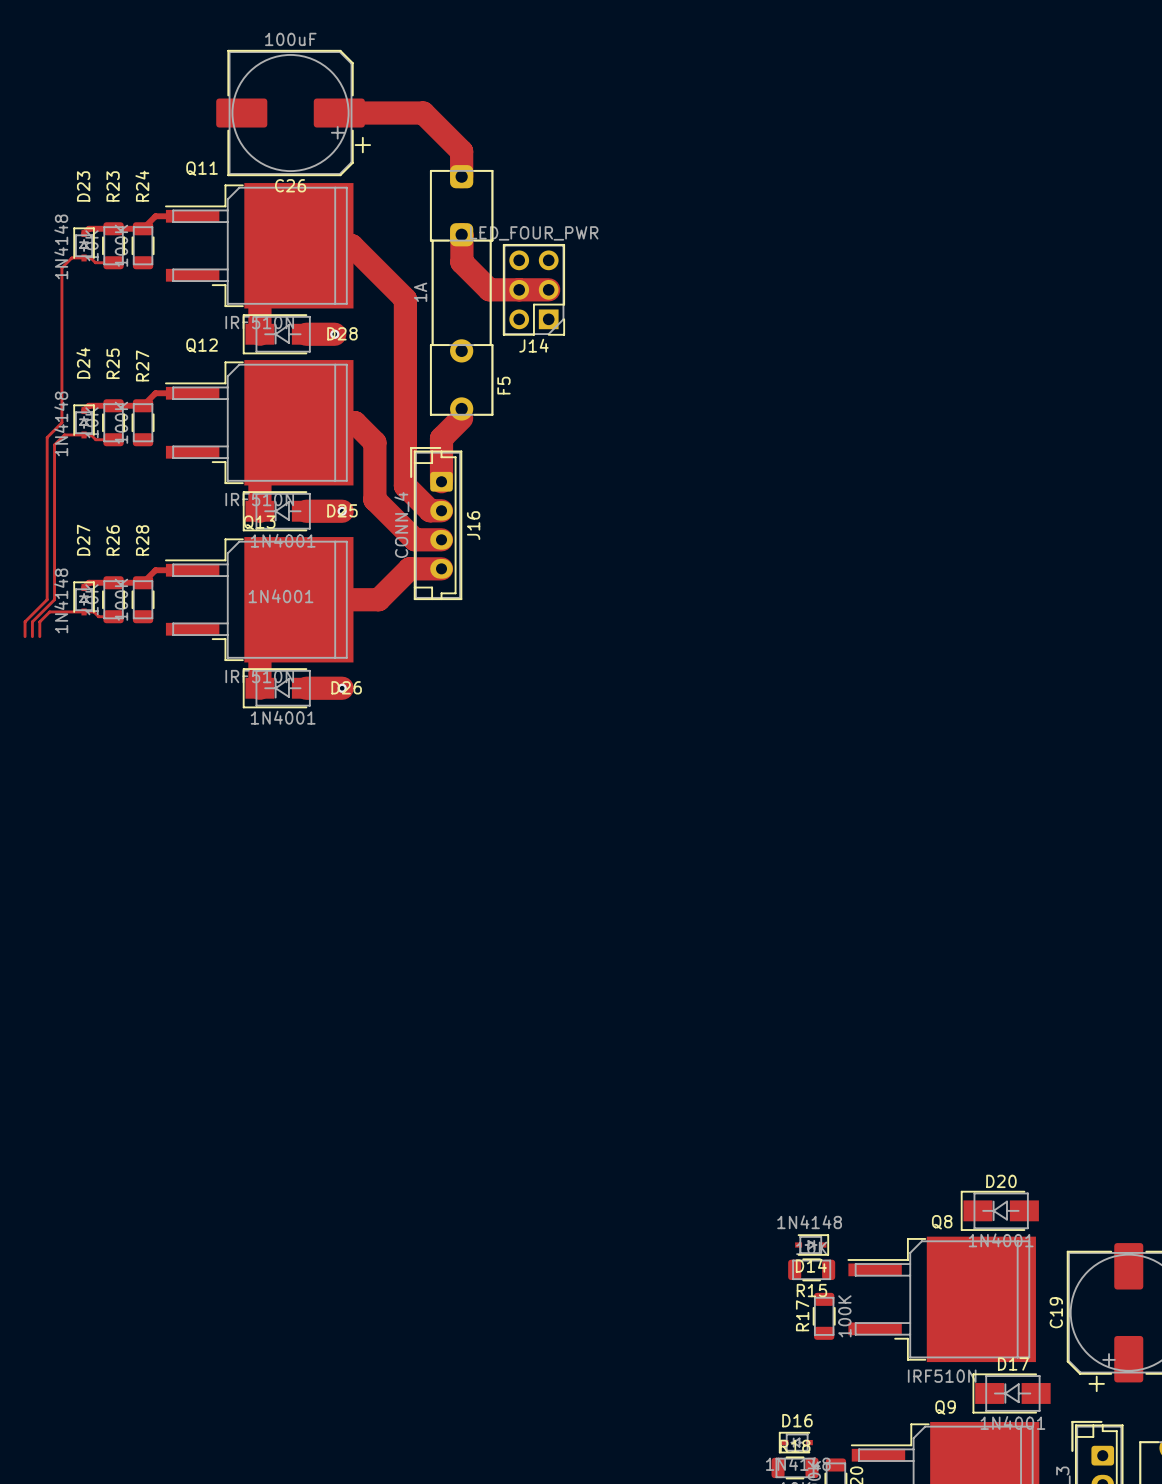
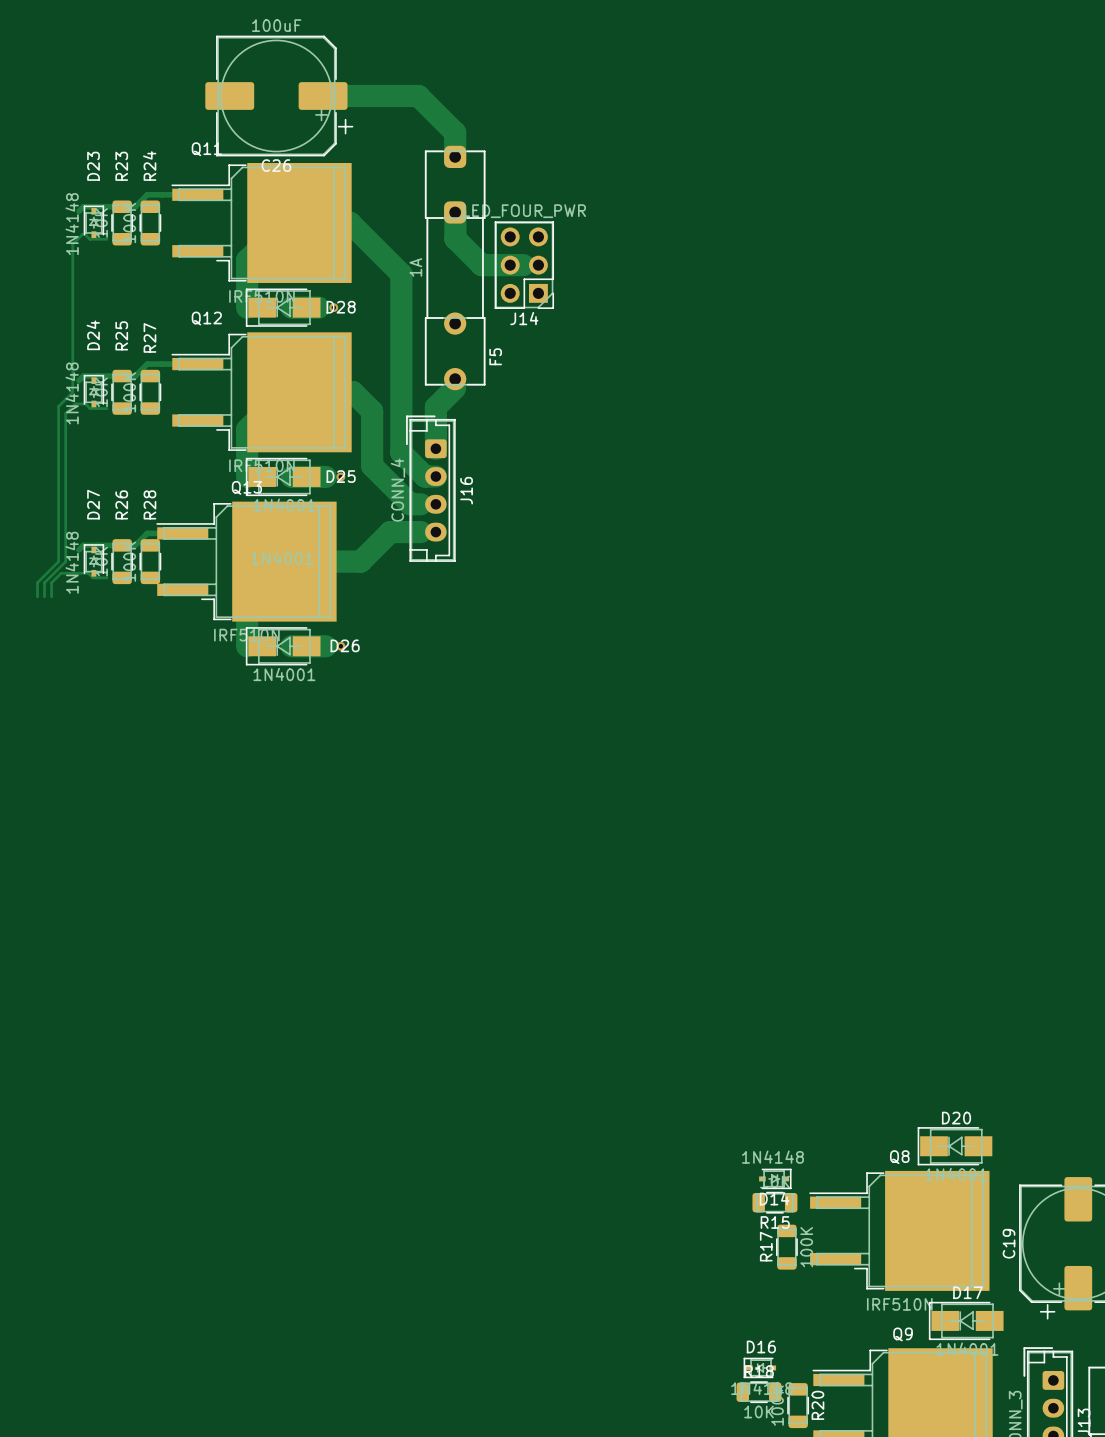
track: (423, 113) (461, 151) (461, 176) -> (403, 96) (418, 96) (455, 132) (455, 156)
track: (461, 234) (461, 262) (489, 289) (505, 289) -> (455, 212) (455, 238) (481, 265)
D23 position: (84, 244) -> (93, 221)
R23 position: (113, 245) -> (122, 222)
R24 position: (143, 245) -> (150, 222)
Q11 position: (259, 245) -> (261, 222)
track: (351, 245) (405, 299) (405, 485) (430, 510) (441, 510) -> (335, 222) (350, 222) (401, 274) (401, 452) (425, 476) (435, 476)
track: (87, 257) (71, 257) (61, 267) (61, 422) (47, 437) (47, 599) (25, 621) (25, 636) -> (82, 234) (72, 244) (72, 392) (58, 406) (58, 561) (37, 582) (37, 596)
J14 position: (533, 289) -> (524, 265)
F5 position: (461, 292) -> (455, 268)
D28 position: (281, 334) -> (283, 307)
via position: (334, 334) -> (333, 307)
track: (461, 418) (441, 438) (441, 481) -> (455, 388) (435, 407) (435, 448)
D24 position: (84, 421) -> (93, 391)
R25 position: (113, 422) -> (122, 392)
R27 position: (143, 422) -> (150, 392)
Q12 position: (259, 422) -> (261, 392)
track: (355, 422) (374, 442) (374, 499) (414, 539) (430, 539) -> (338, 392) (353, 392) (372, 411) (372, 465) (410, 504)
track: (80, 434) (64, 434) (54, 444) (54, 599) (32, 621) (32, 636) -> (75, 403) (65, 413) (65, 561) (44, 582) (44, 596)
D25 position: (281, 511) -> (283, 476)
via position: (342, 511) -> (340, 476)
J16 position: (436, 523) -> (430, 488)
D27 position: (84, 598) -> (93, 560)
R26 position: (113, 599) -> (122, 561)
R28 position: (143, 599) -> (150, 561)
track: (65, 611) (49, 611) (39, 621) (39, 636) -> (61, 573) (51, 582) (51, 596)
D26 position: (281, 688) -> (283, 646)
via position: (342, 688) -> (340, 646)

